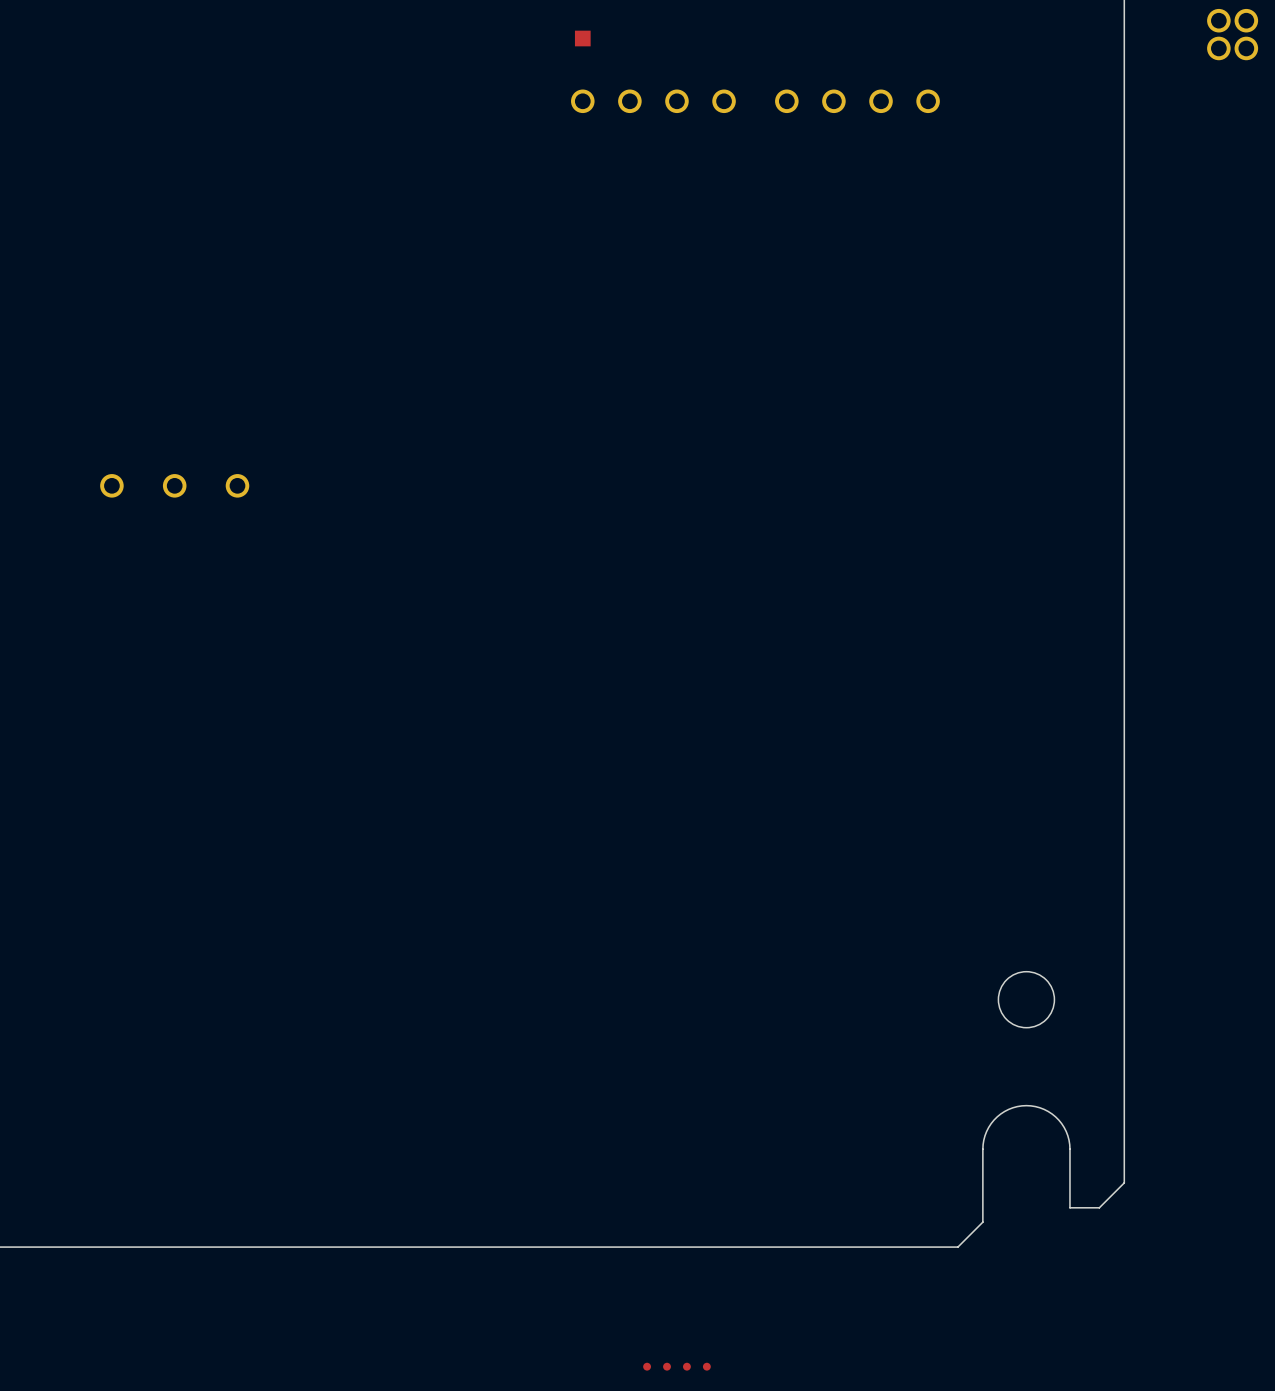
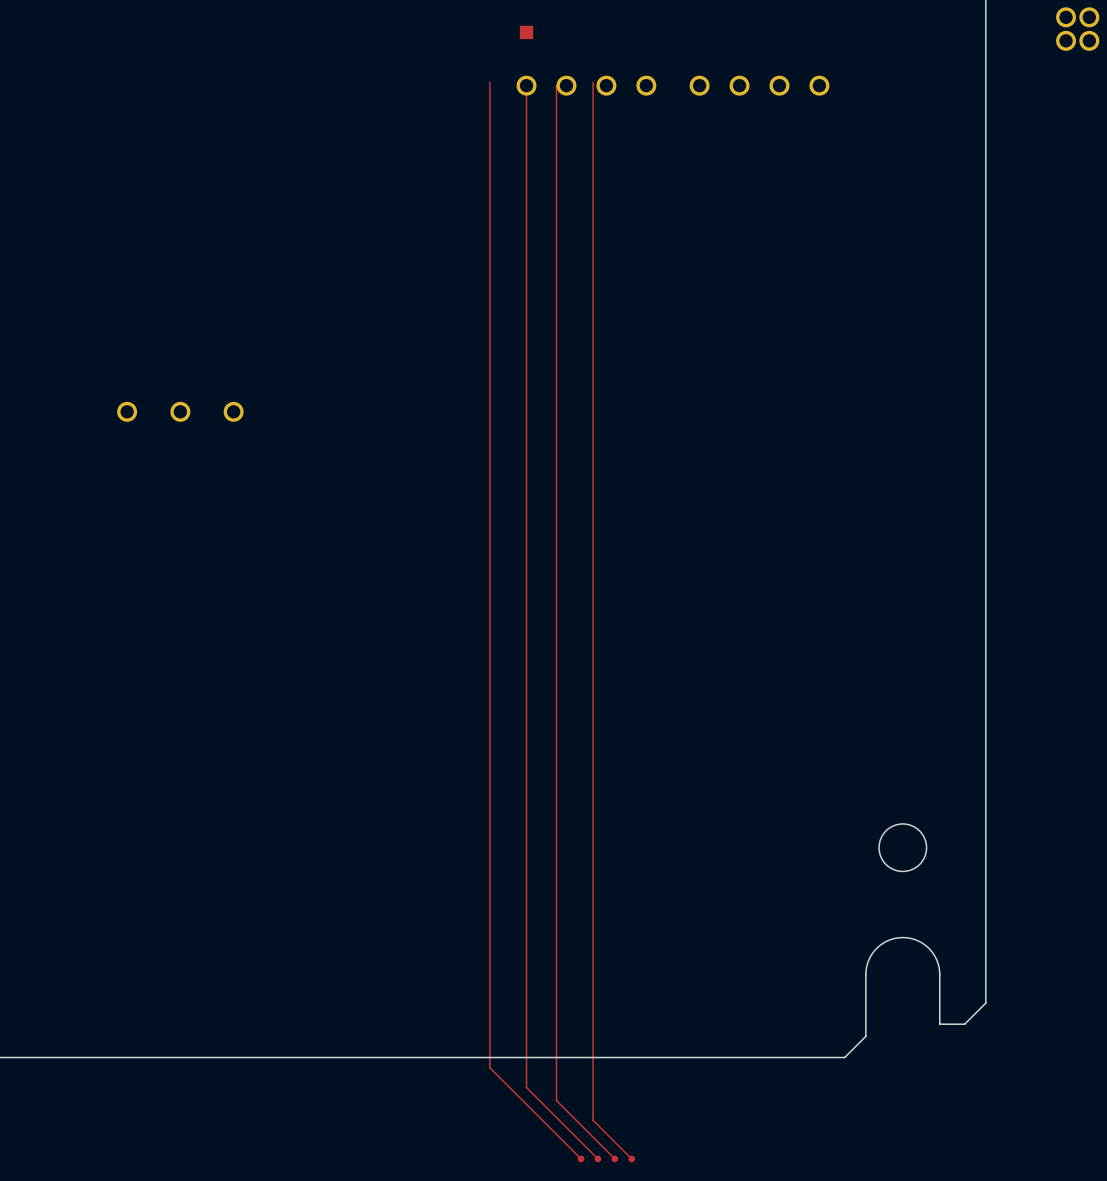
top track: none -> (489, 82) (489, 1067) (581, 1158)
top track: none -> (593, 82) (593, 1120) (631, 1158)
top track: none -> (526, 83) (526, 1087) (597, 1158)
top track: none -> (556, 85) (556, 1100) (614, 1158)

